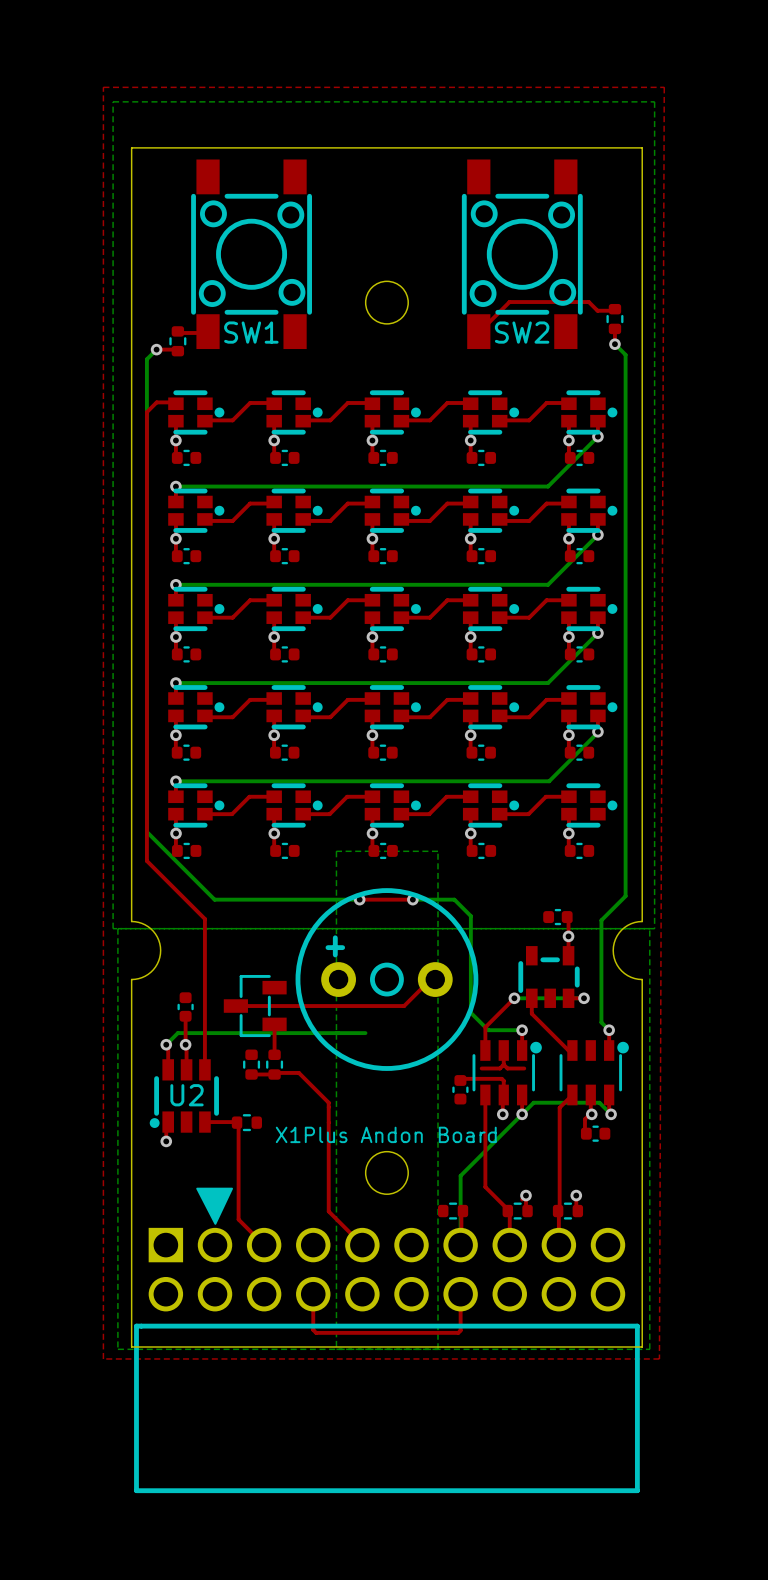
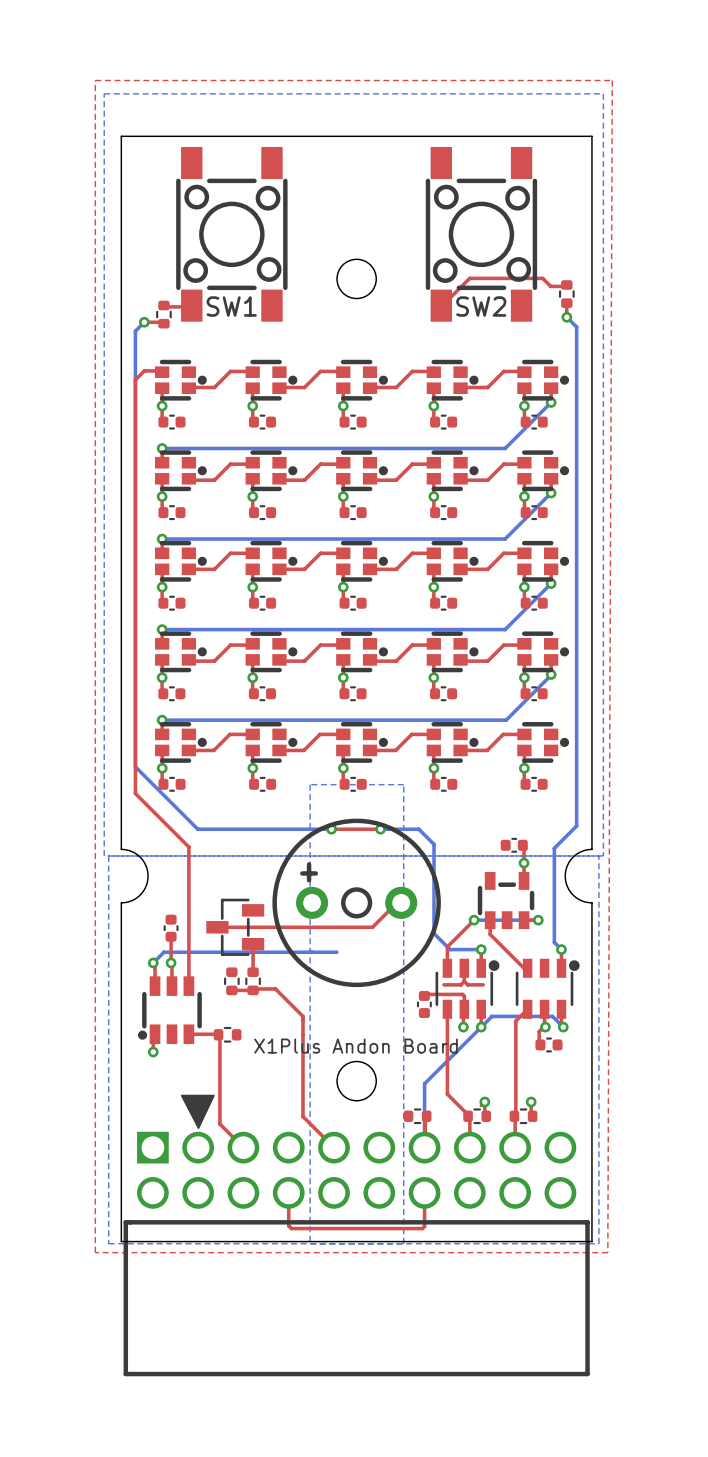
U2 name: U2 (187, 1095) -> none

